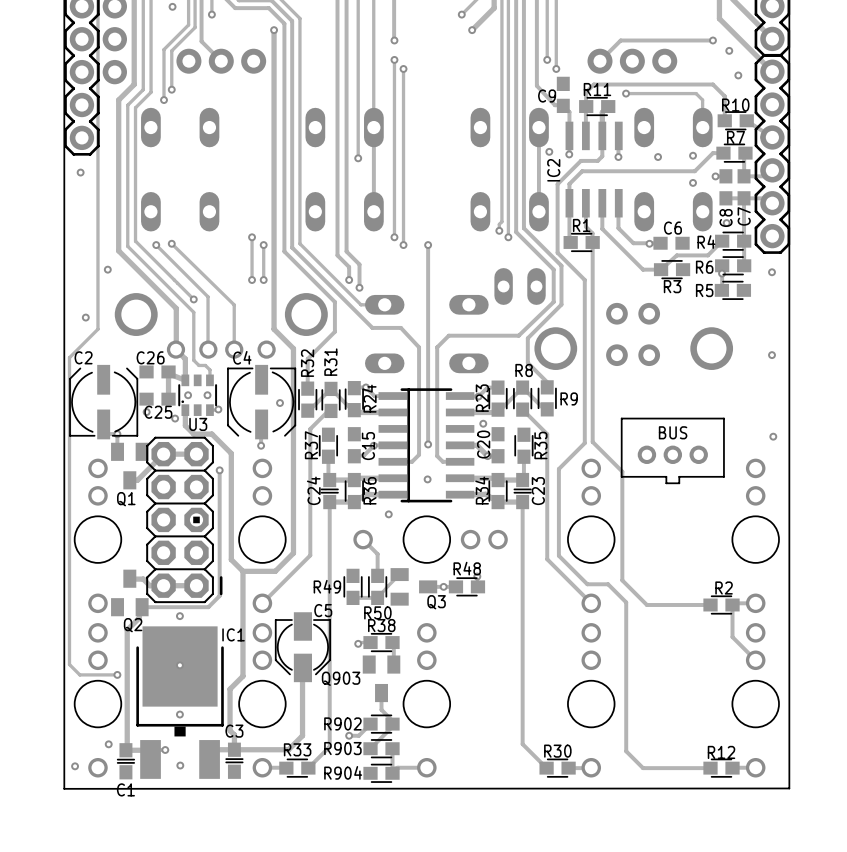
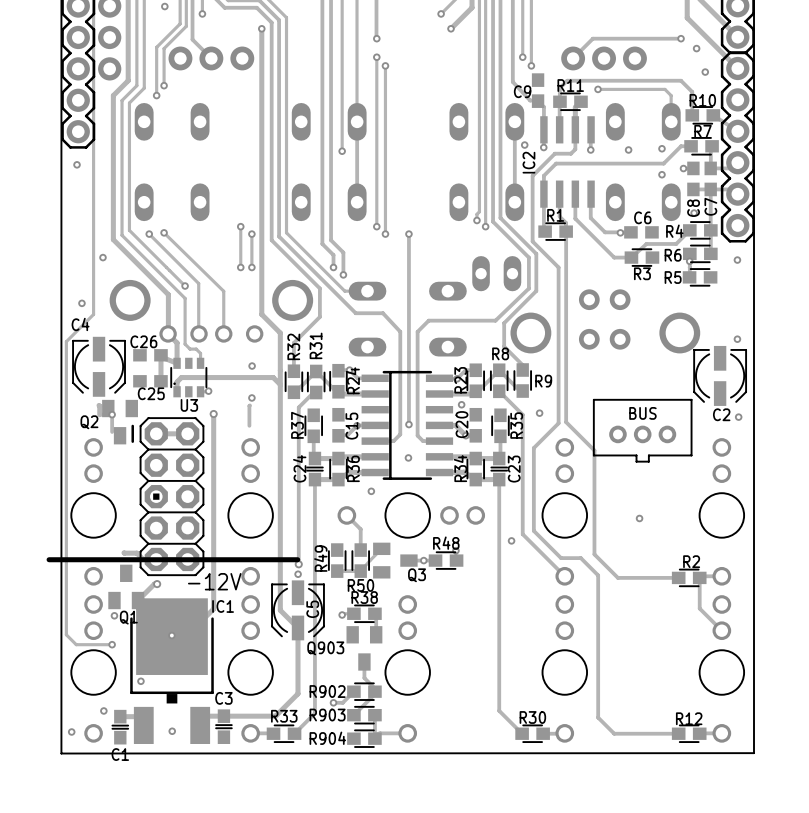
C2 name position: C2 (83, 357) -> C2 (721, 414)
C2 footprint: [69, 364, 138, 440] -> [693, 345, 747, 406]
C4 footprint: [227, 364, 296, 440] -> [72, 336, 126, 397]
via: none -> (252, 366)
via: (188, 395) -> none
via: (207, 395) -> none
via: (280, 403) -> none
track: (185, 410) (185, 425) (193, 434) (211, 434) (231, 453) (231, 559) (242, 571) -> (177, 391) (177, 381) (181, 377) (273, 377) (280, 384)
via: (146, 412) -> none
via: none -> (251, 397)
via: (175, 418) -> none
track: (312, 426) (310, 429) (310, 555) (262, 603) -> (298, 407) (298, 564)
via: none -> (539, 413)
track: none -> (213, 414) (213, 608) (172, 650) (160, 638) (160, 603)
via: none -> (213, 414)
via: (261, 445) -> none
track: (163, 454) (137, 480) (129, 480) -> none
Q1 rotation: 0° (129, 466) -> 180° (126, 586)
Q1 position: (129, 466) -> (126, 586)
track: (219, 470) (219, 595) (208, 607) (142, 607) (139, 609) (139, 617) (127, 630) (127, 748) (165, 750) -> none
via: (219, 470) -> none
part rotation: 0° (184, 519) -> 180° (167, 496)
via: none -> (639, 518)
track: (293, 553) (275, 571) (242, 571) -> none
via: none -> (511, 540)
track: (242, 571) (242, 676) (230, 689) (230, 730) (234, 734) (234, 749) -> none
line: none -> (297, 559) (49, 559)
R49 name rotation: 0° (327, 586) -> 90° counterclockwise (320, 558)
via: none -> (298, 564)
Q2 rotation: 0° (129, 592) -> 180° (120, 422)
Q2 position: (129, 592) -> (120, 422)
via: none -> (298, 574)
text: none -> -12V (214, 581)
C5 name position: C5 (323, 610) -> C5 (312, 609)
track: none -> (157, 584) (154, 584) (137, 600)
via: none -> (157, 584)
C5 footprint: [275, 612, 331, 683] -> [271, 580, 325, 641]
via: (179, 616) -> none
Q2 name position: Q2 (133, 625) -> Q2 (89, 422)
via: none -> (114, 615)
track: (302, 667) (302, 735) -> (280, 528) (280, 610) (298, 627) (298, 693) (288, 702)
via: none -> (140, 681)
via: (179, 714) -> none
via: (165, 750) -> none

